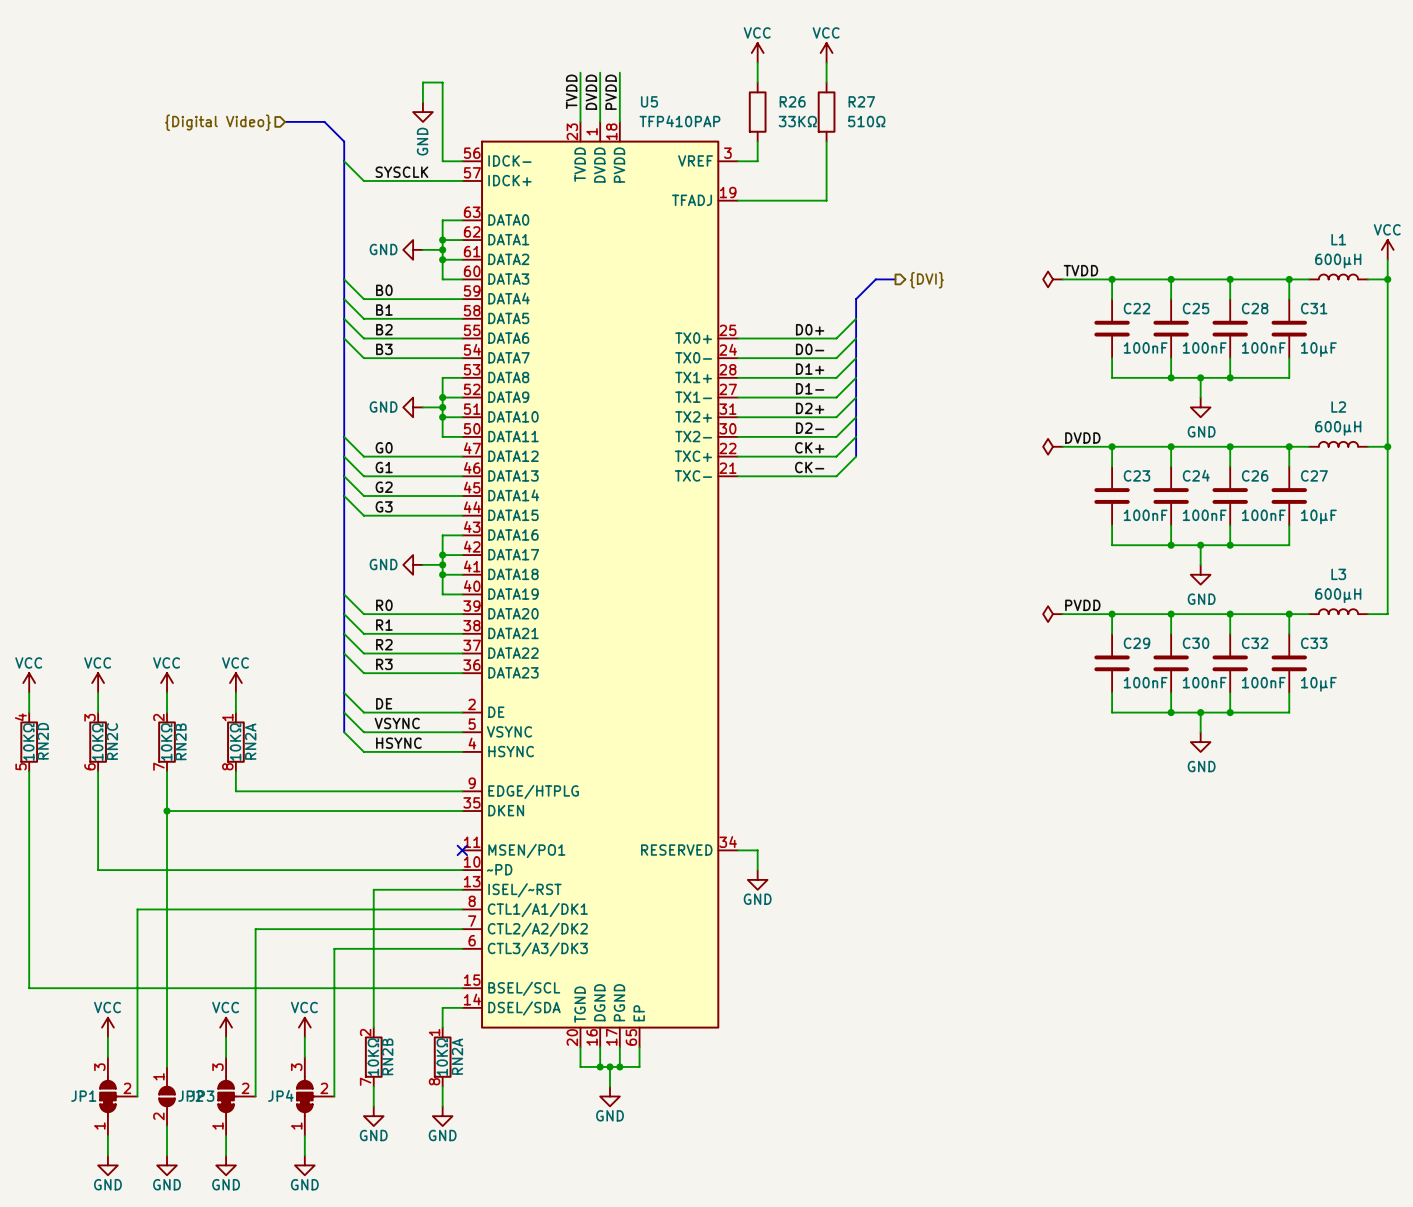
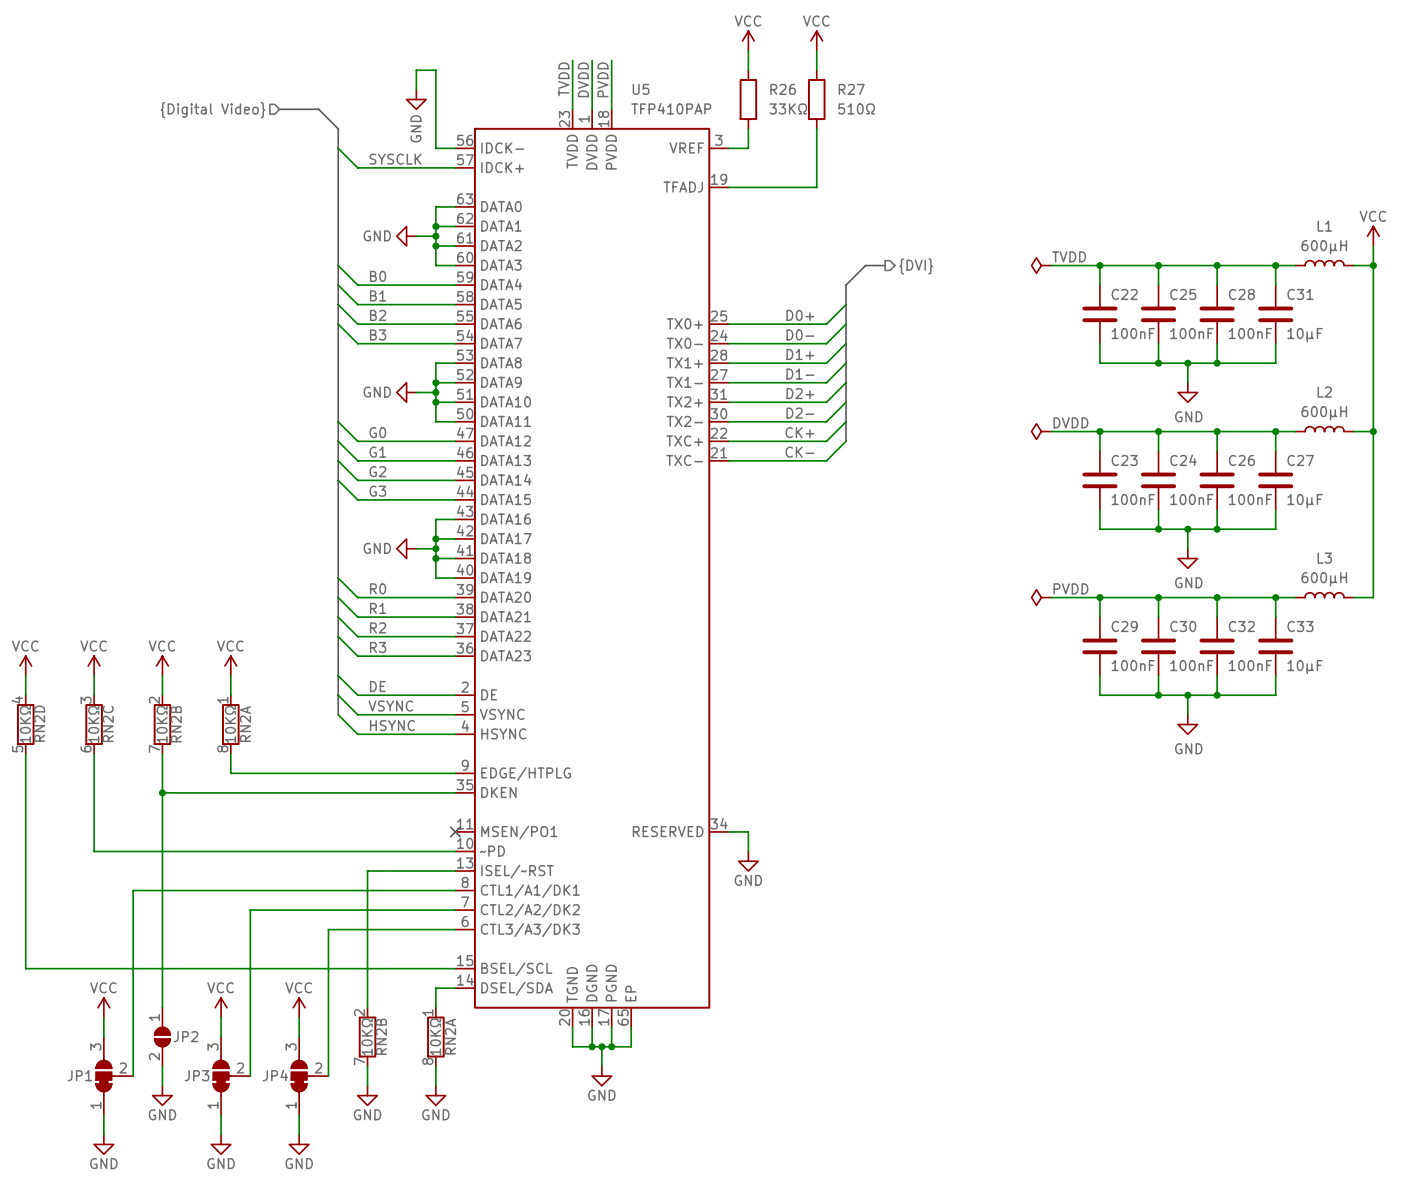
JP2 position: (167, 1096) -> (162, 1037)
wire: (167, 1126) (167, 1155) -> none
power symbol position: GND (167, 1165) -> GND (162, 1095)

